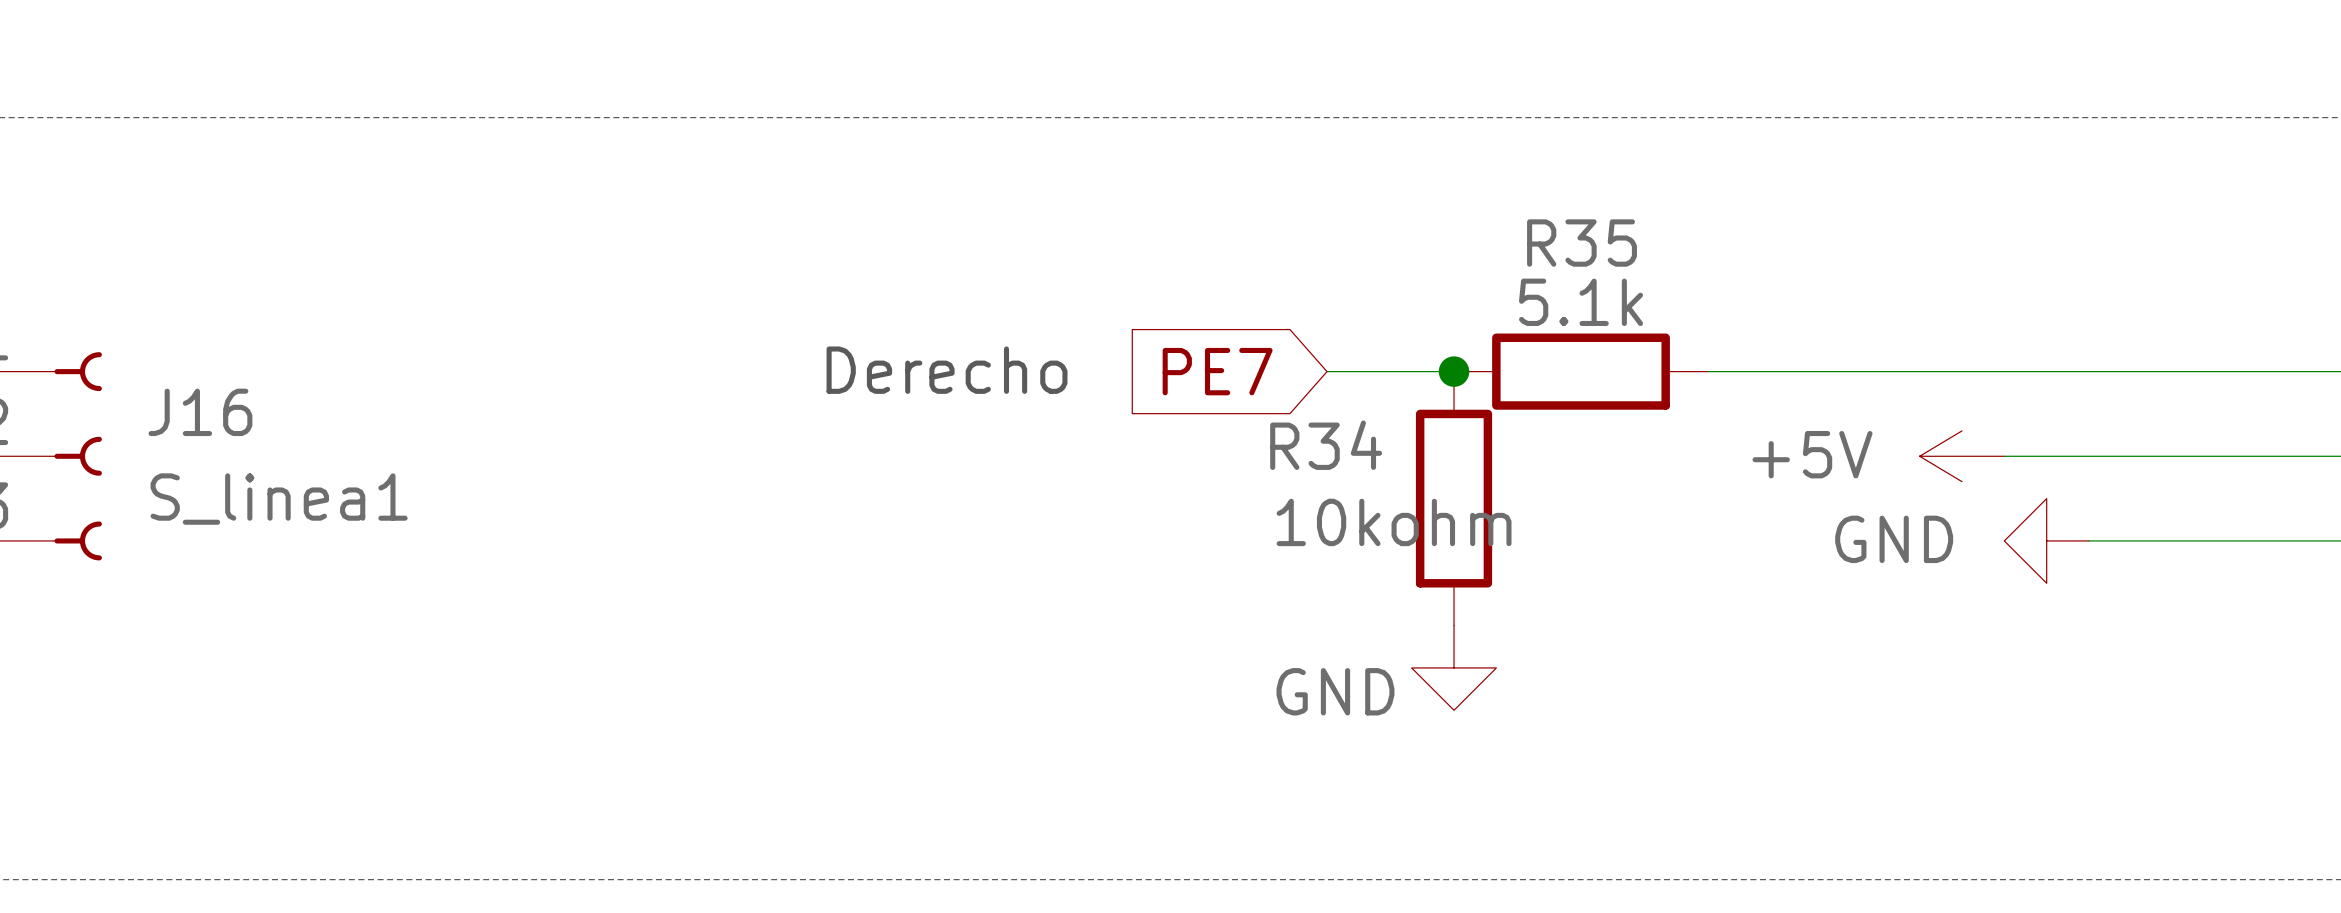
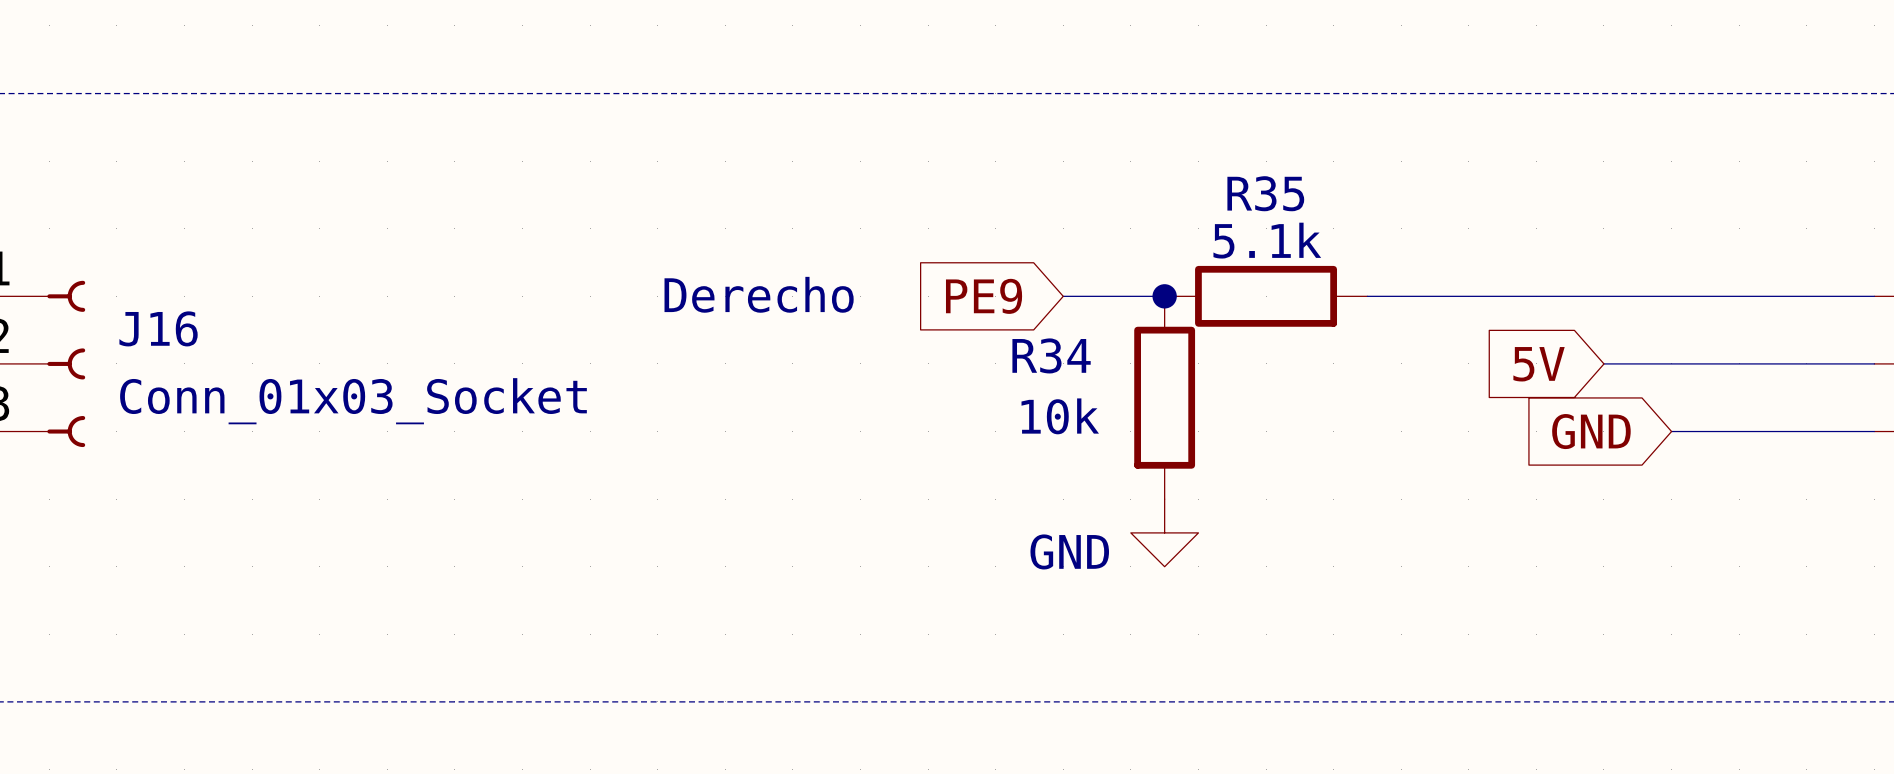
global label: PE7 (1217, 371) -> PE9 (984, 296)
global label: none -> 5V (1539, 364)
power symbol: +5V (1962, 456) -> none
J16 value: S_linea1 (279, 499) -> Conn_01x03_Socket (353, 401)
R34 value: 10kohm (1394, 522) -> 10k (1060, 416)
global label: none -> GND (1591, 431)
power symbol: GND (2046, 540) -> none

